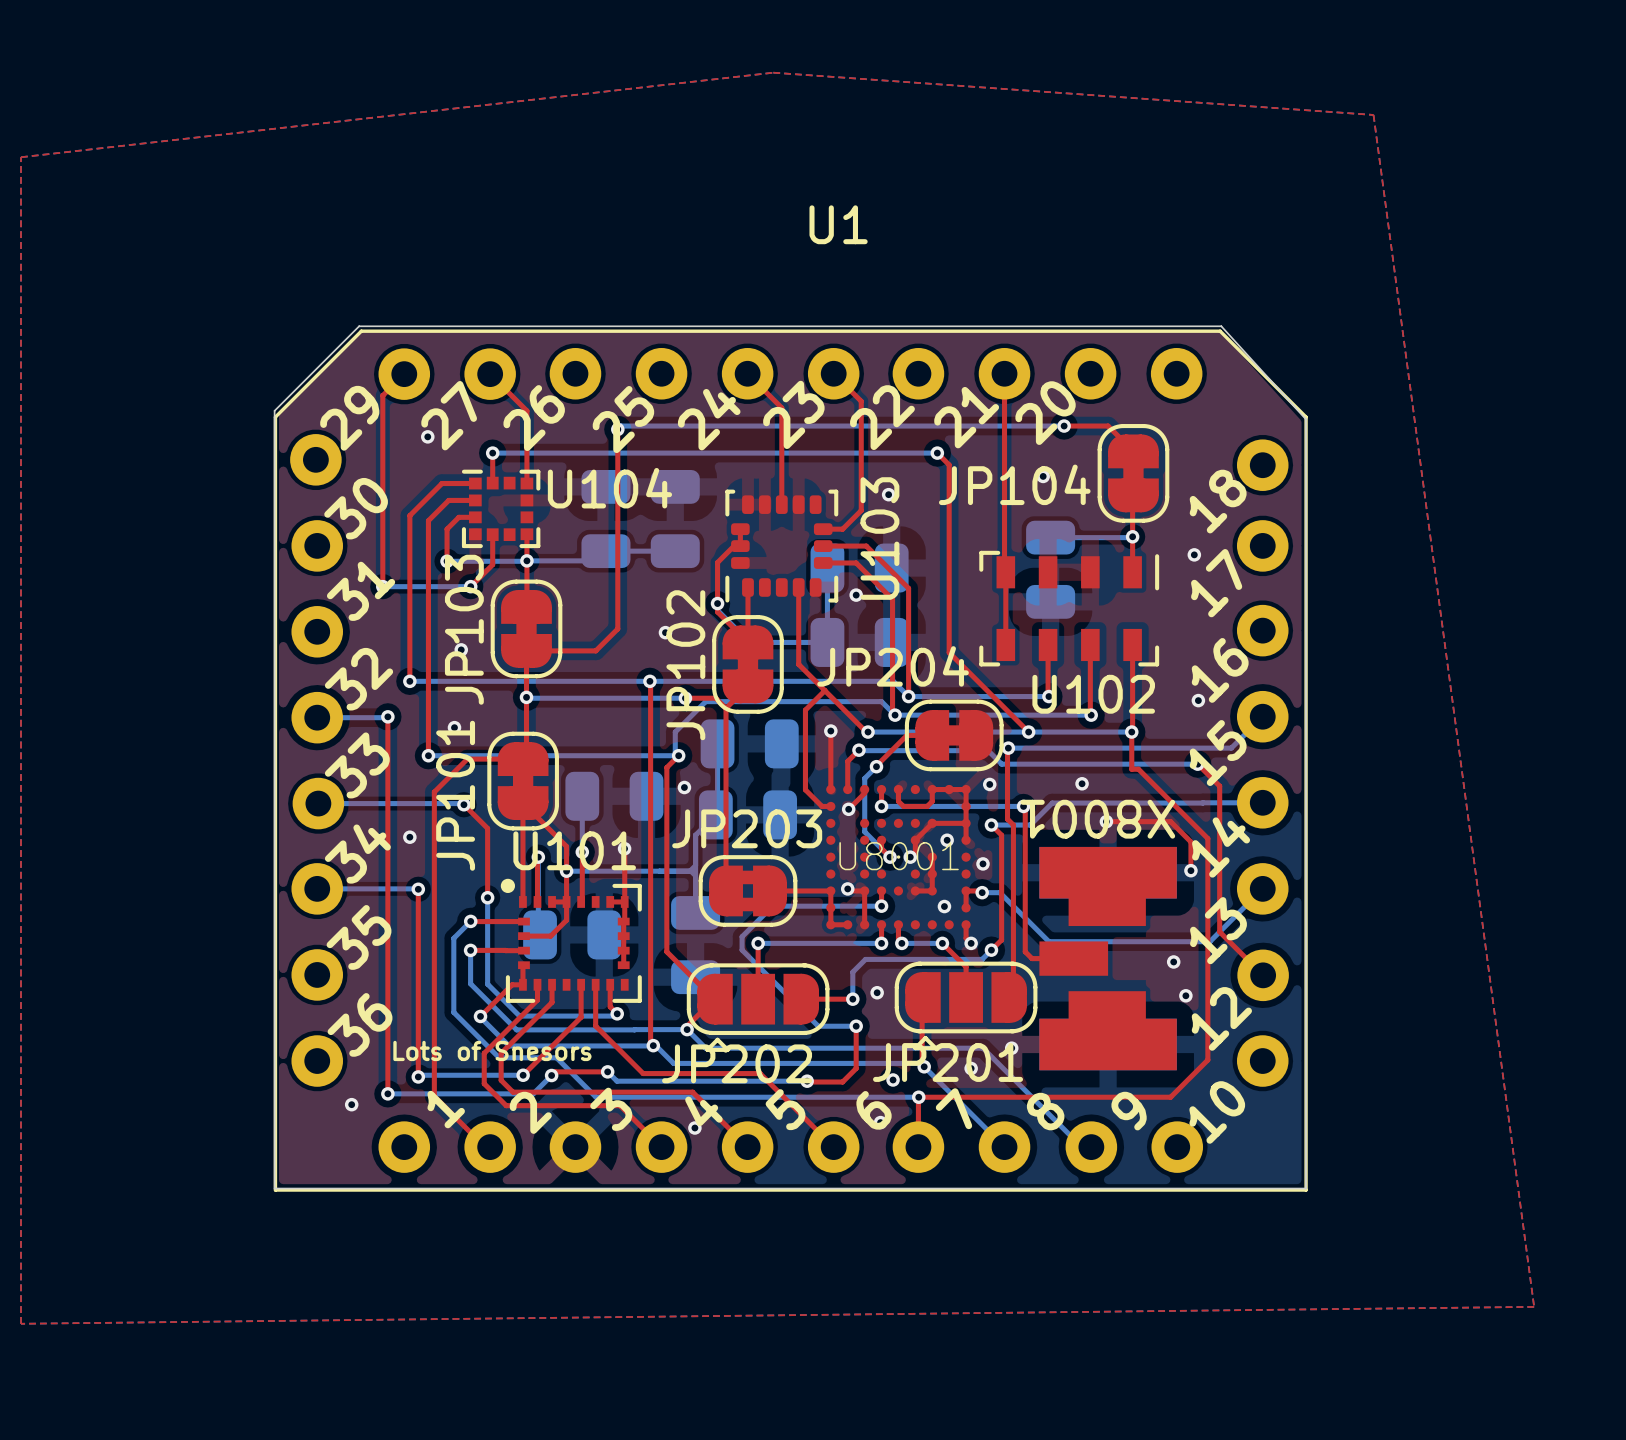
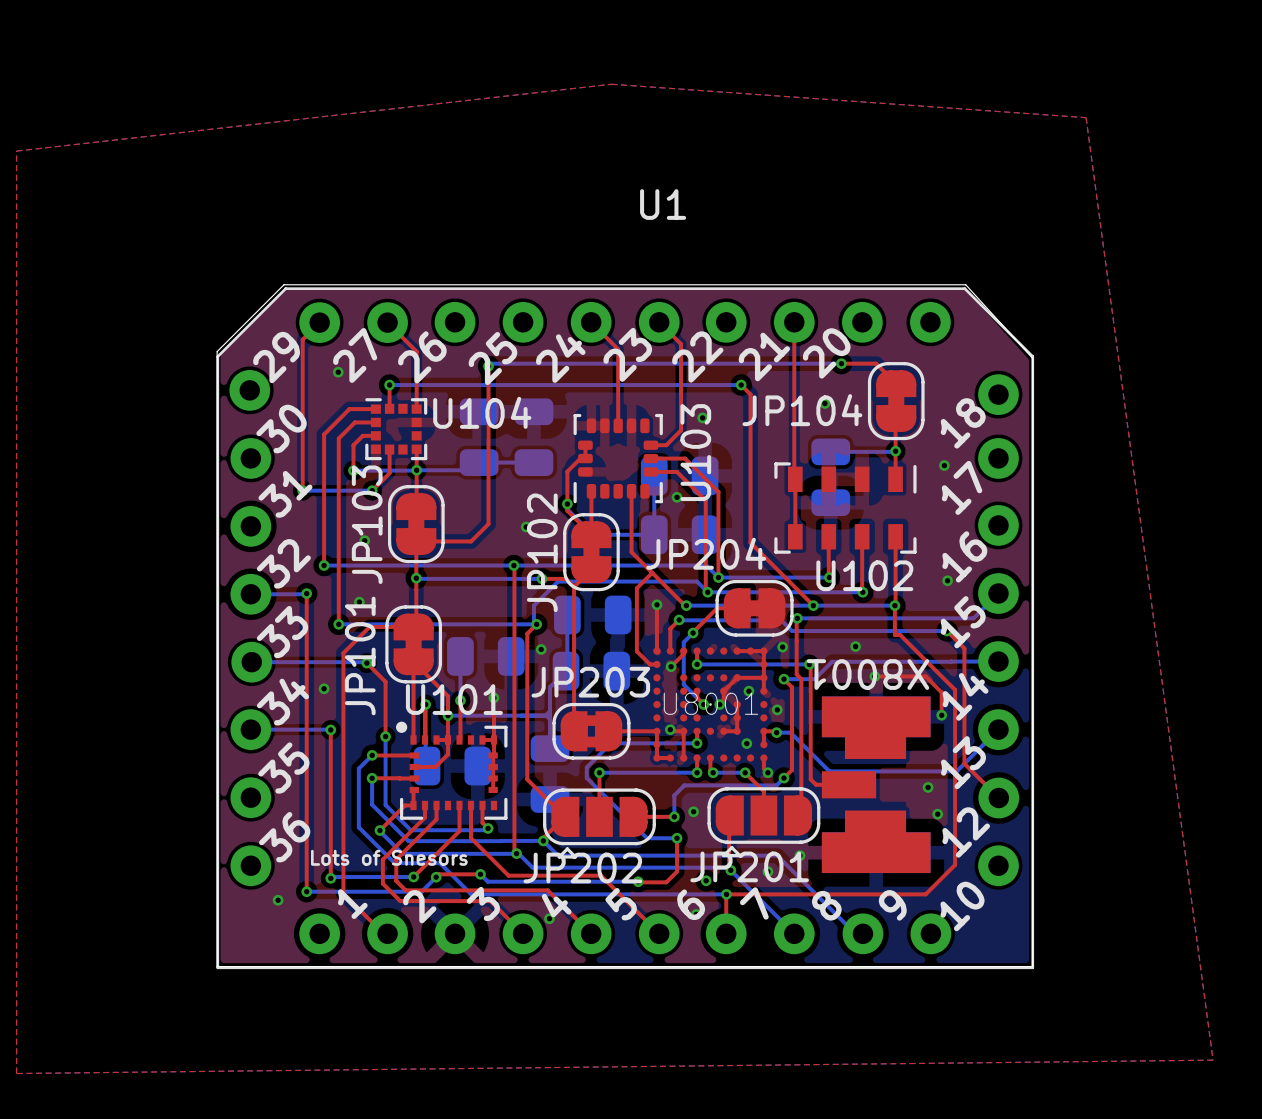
top track: (898, 789) (898, 801) (903, 806) (927, 806) (932, 801) (932, 789) -> none

